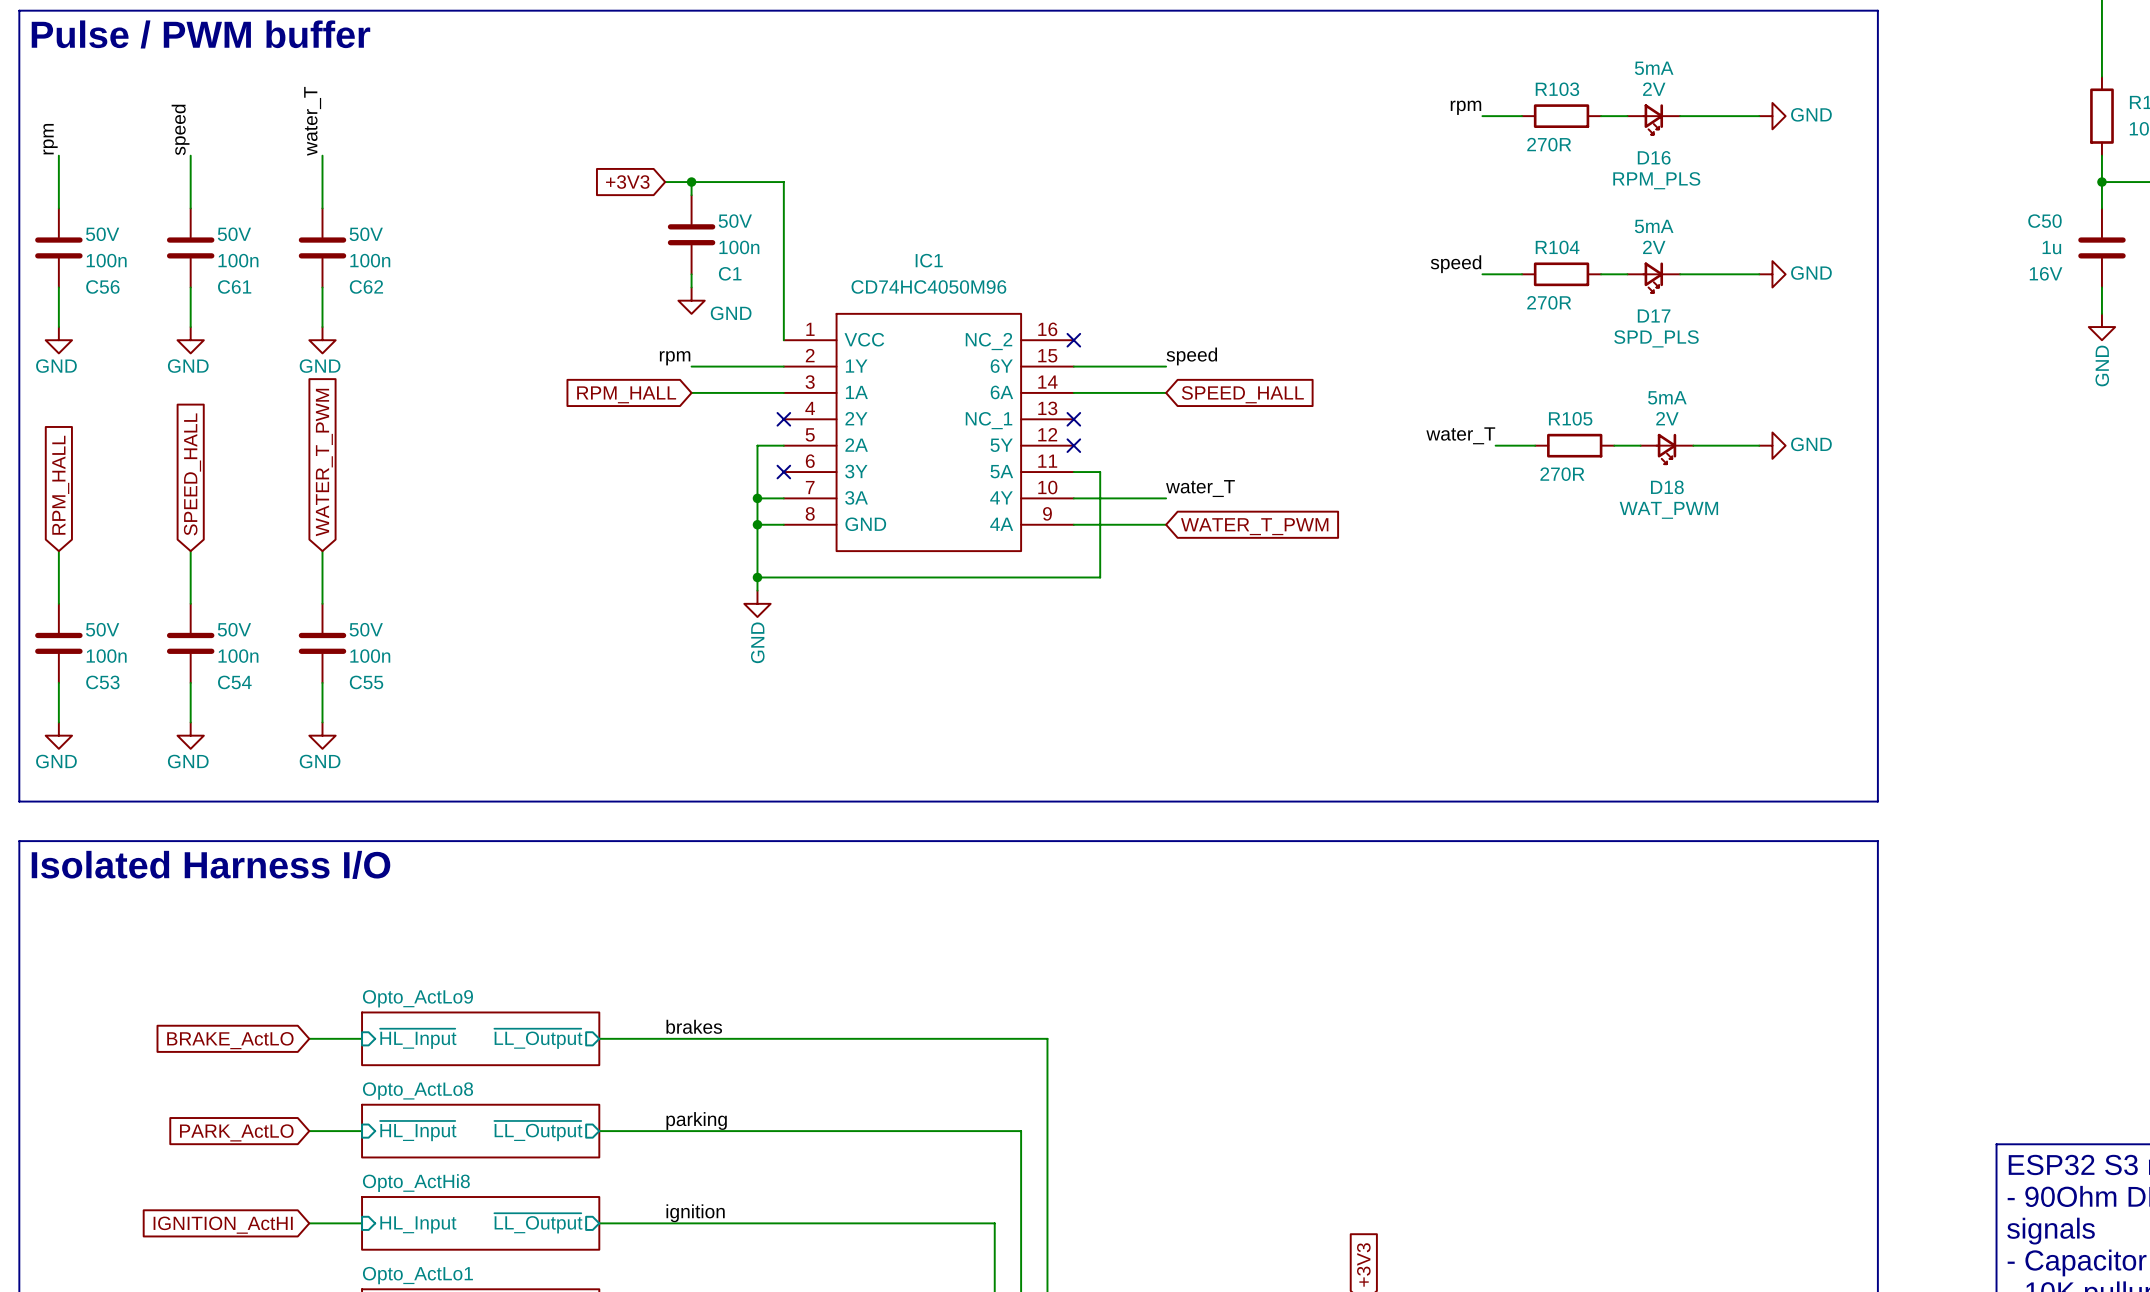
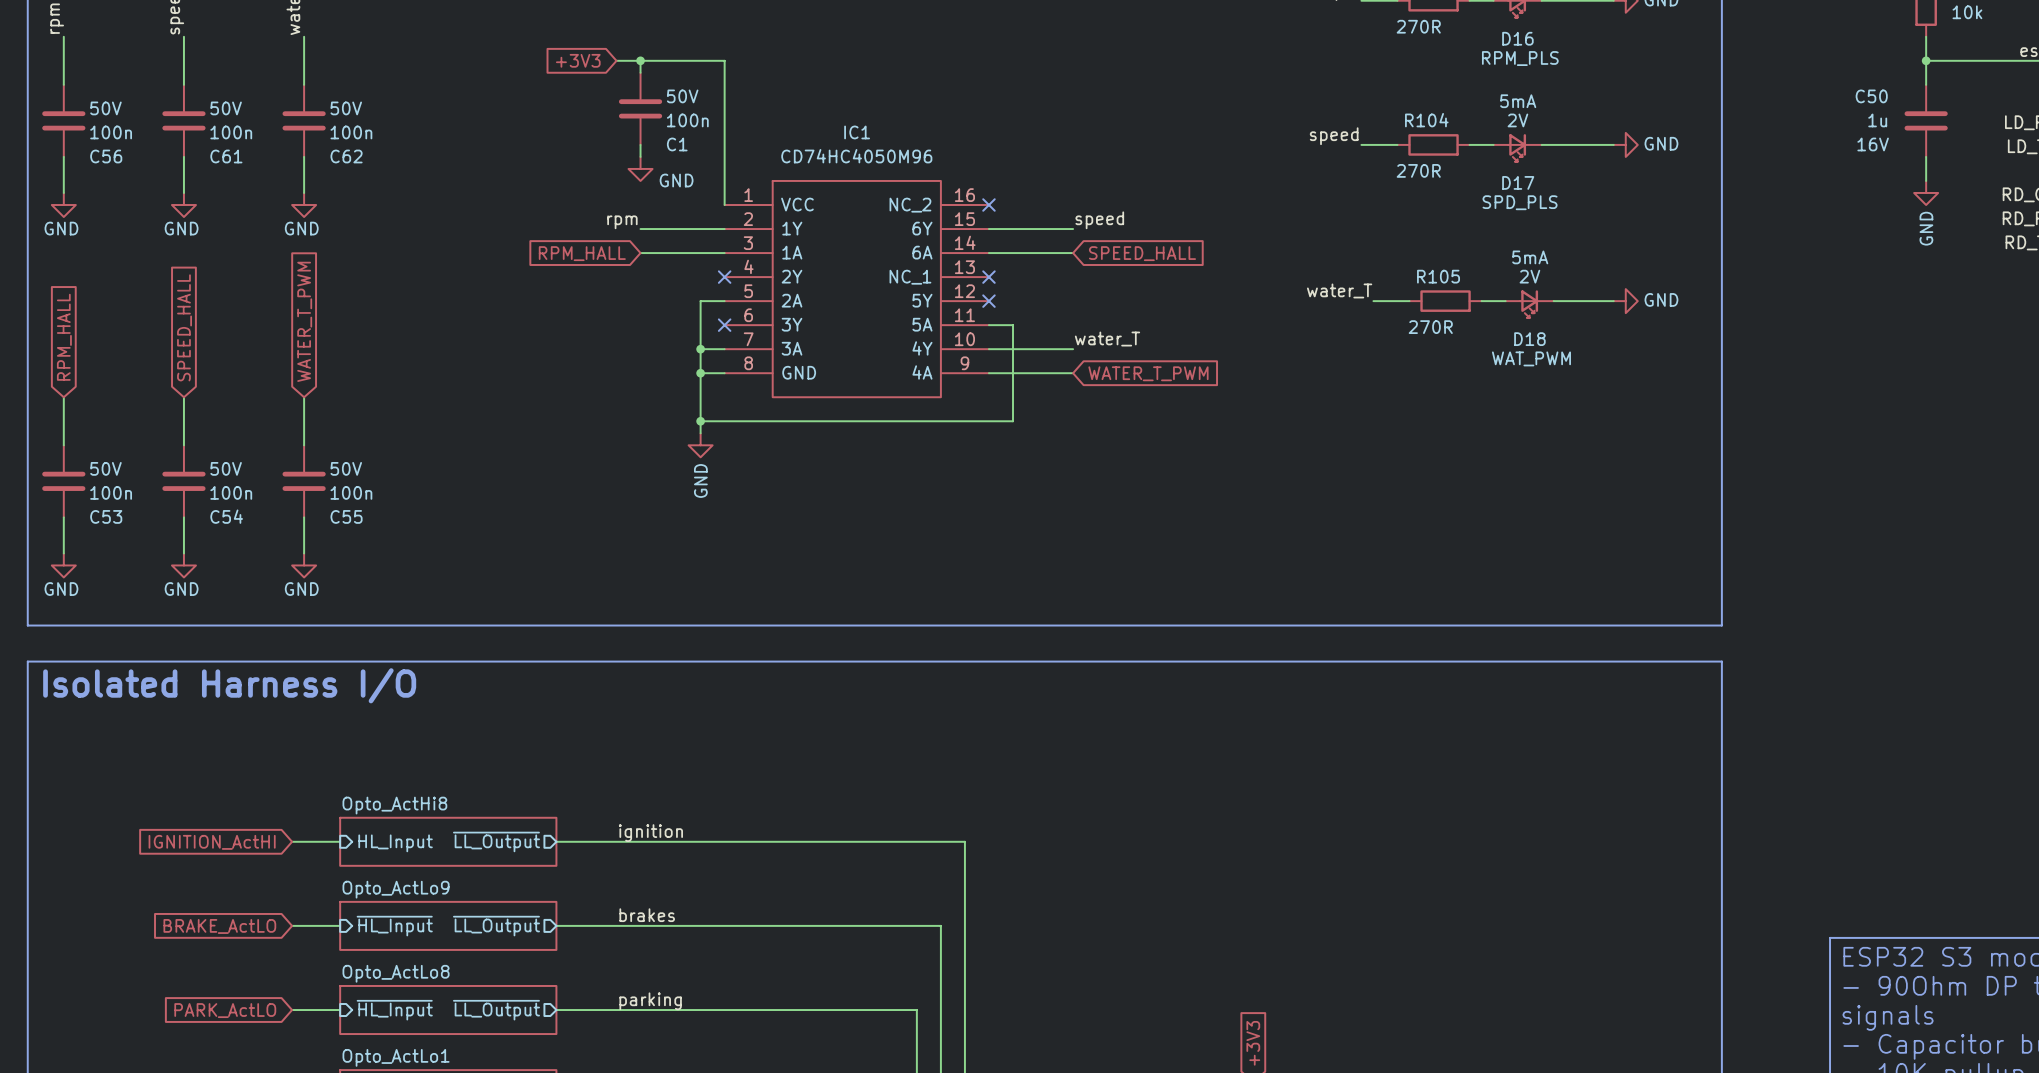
sheet Opto_ActLo9 name: Opto_ActLo9 (417, 998) -> Opto_ActHi8 (394, 805)
label: brakes (694, 1026) -> ignition (650, 833)
sheet pin: ~{HL_Input} (418, 1038) -> HL_Input (395, 843)
global label: BRAKE_ActLO (230, 1040) -> IGNITION_ActHI (212, 842)
sheet Opto_ActLo8 name: Opto_ActLo8 (418, 1091) -> Opto_ActLo9 (396, 889)
label: parking (696, 1120) -> brakes (647, 915)
global label: PARK_ActLO (236, 1132) -> BRAKE_ActLO (219, 926)
sheet Opto_ActHi8 name: Opto_ActHi8 (416, 1183) -> Opto_ActLo8 (396, 973)
label: ignition (695, 1213) -> parking (650, 1001)
sheet pin: HL_Input (418, 1224) -> ~{HL_Input} (394, 1010)
global label: IGNITION_ActHI (223, 1225) -> PARK_ActLO (225, 1010)

